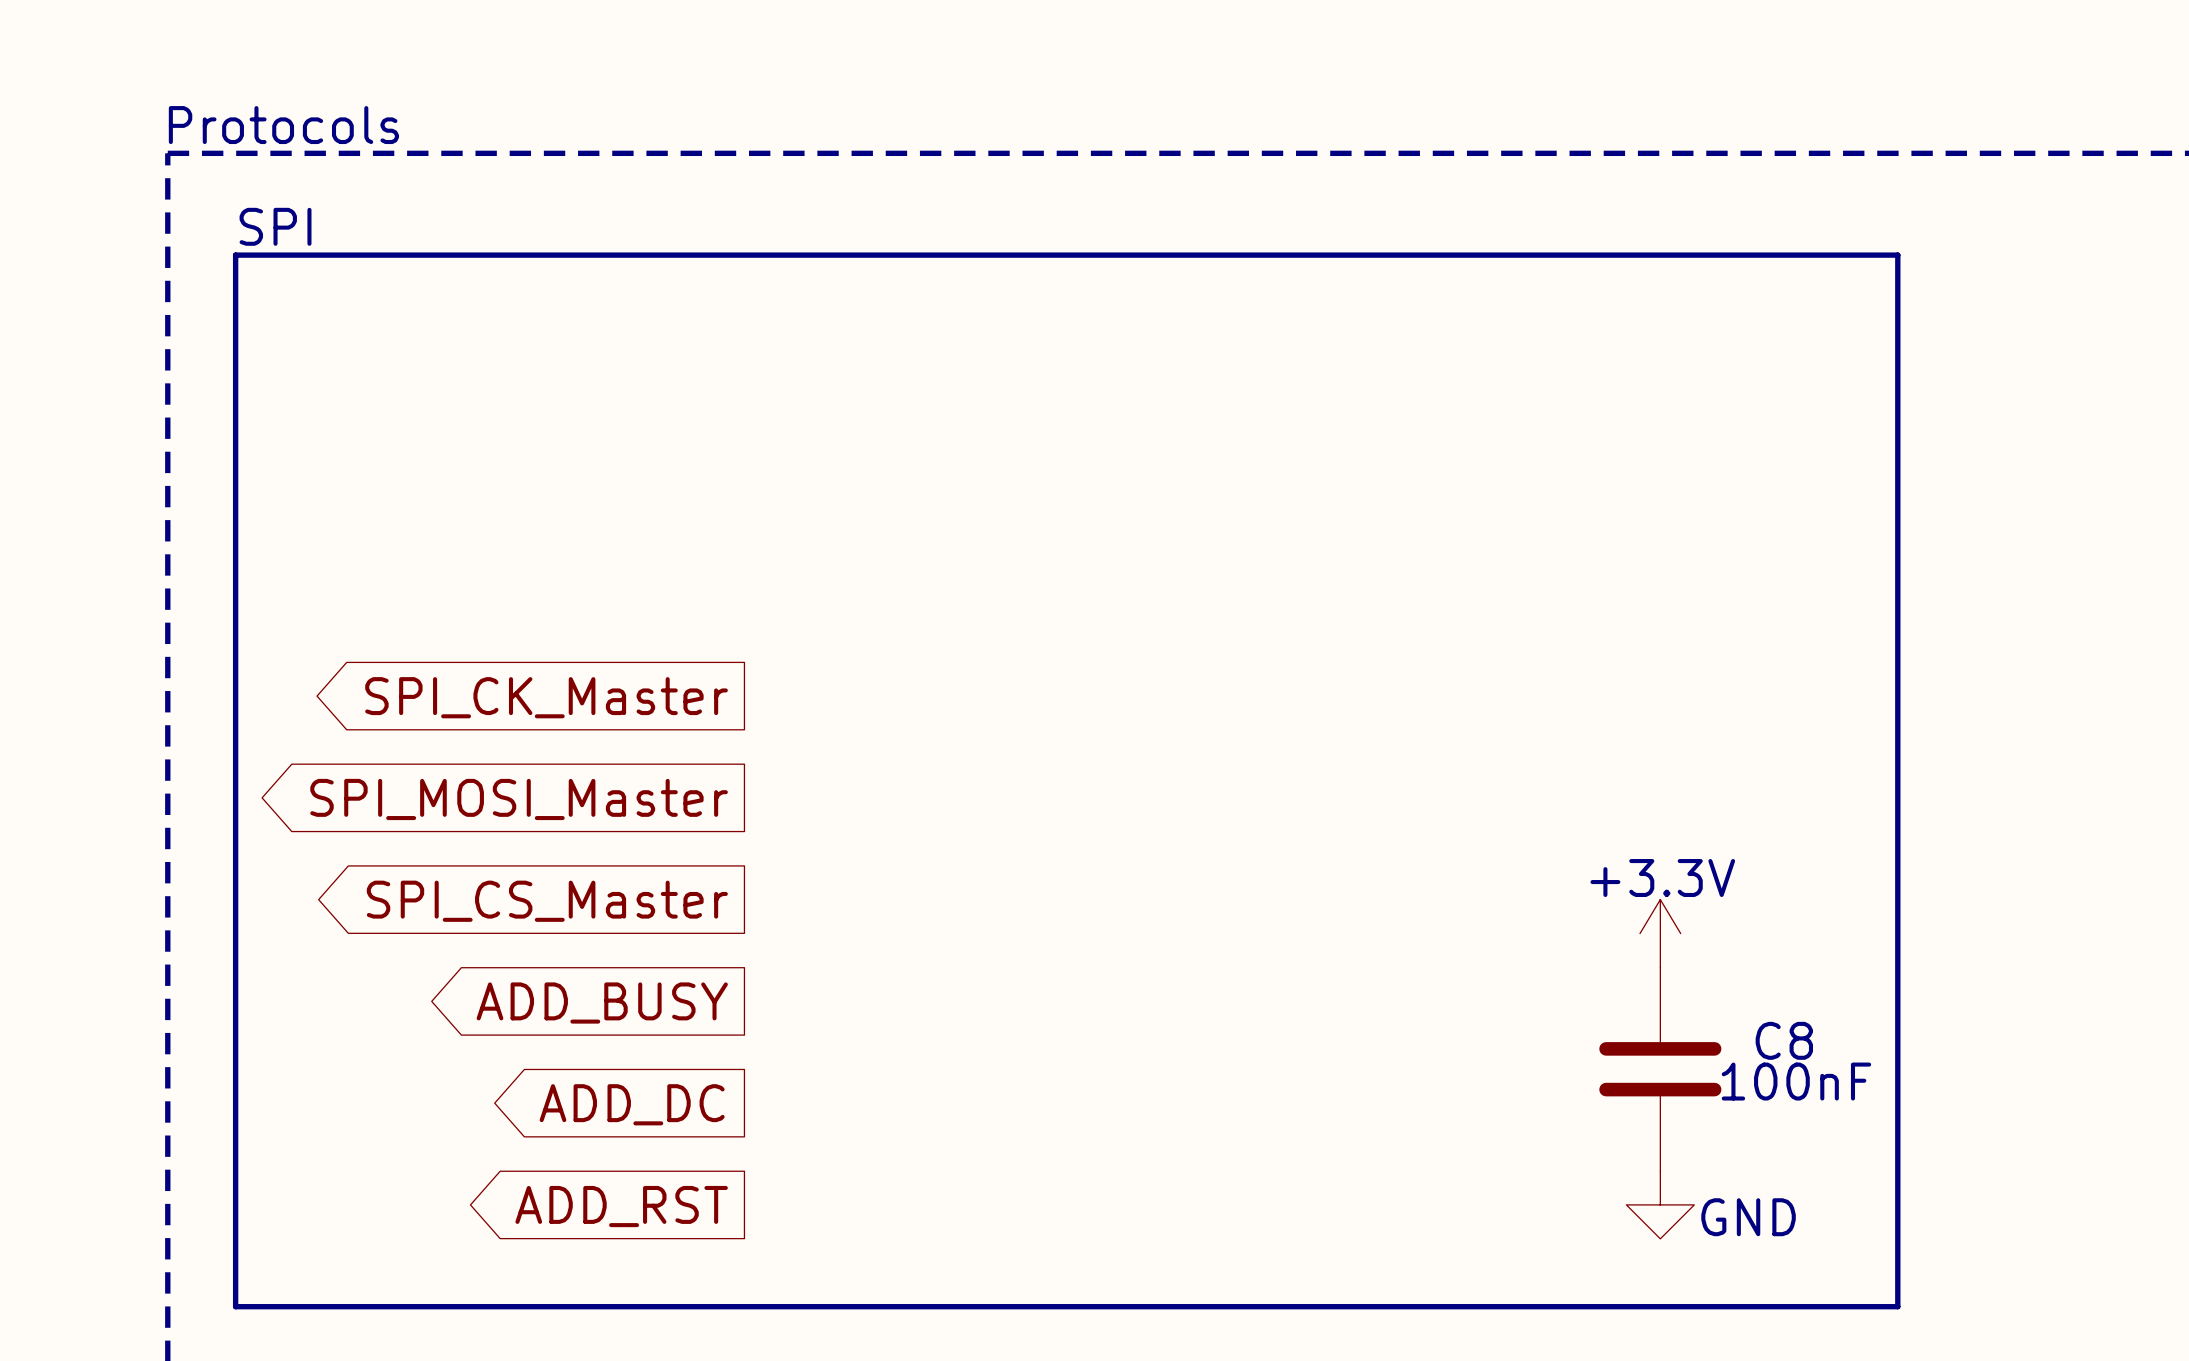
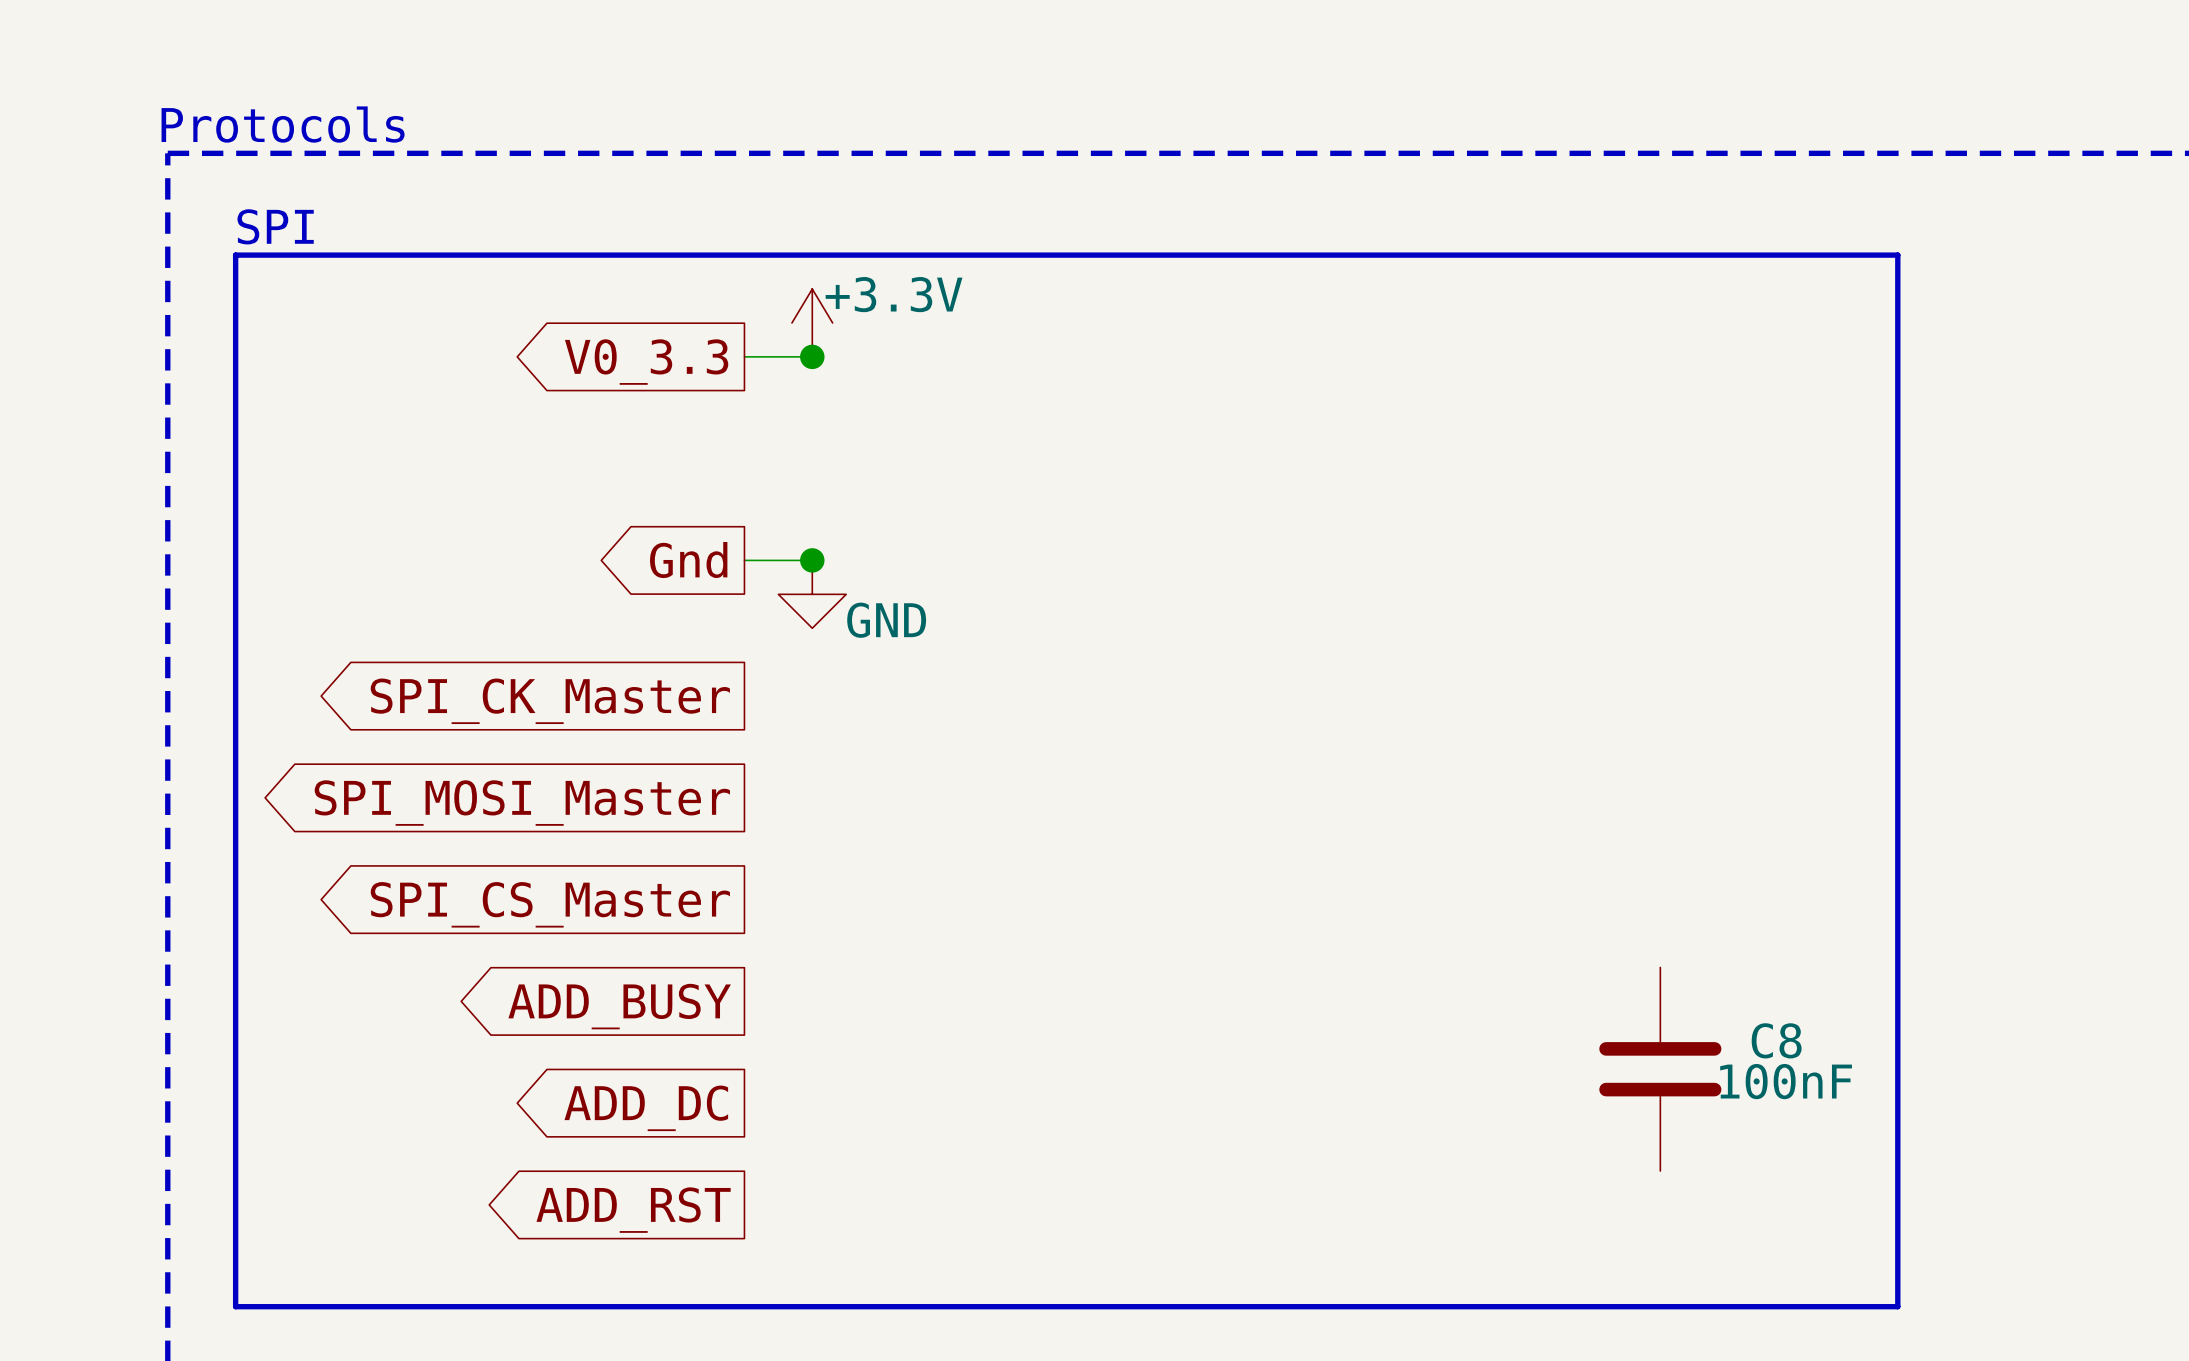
power symbol: none -> +3.3V (812, 322)
wire: none -> (744, 356) (812, 356)
junction: none -> (812, 356)
global label: none -> V0_3.3 (646, 362)
global label: none -> Gnd (688, 560)
wire: none -> (744, 560) (812, 560)
junction: none -> (812, 560)
power symbol: none -> GND (812, 594)
power symbol: +3.3V (1660, 933) -> none
power symbol: GND (1660, 1204) -> none

